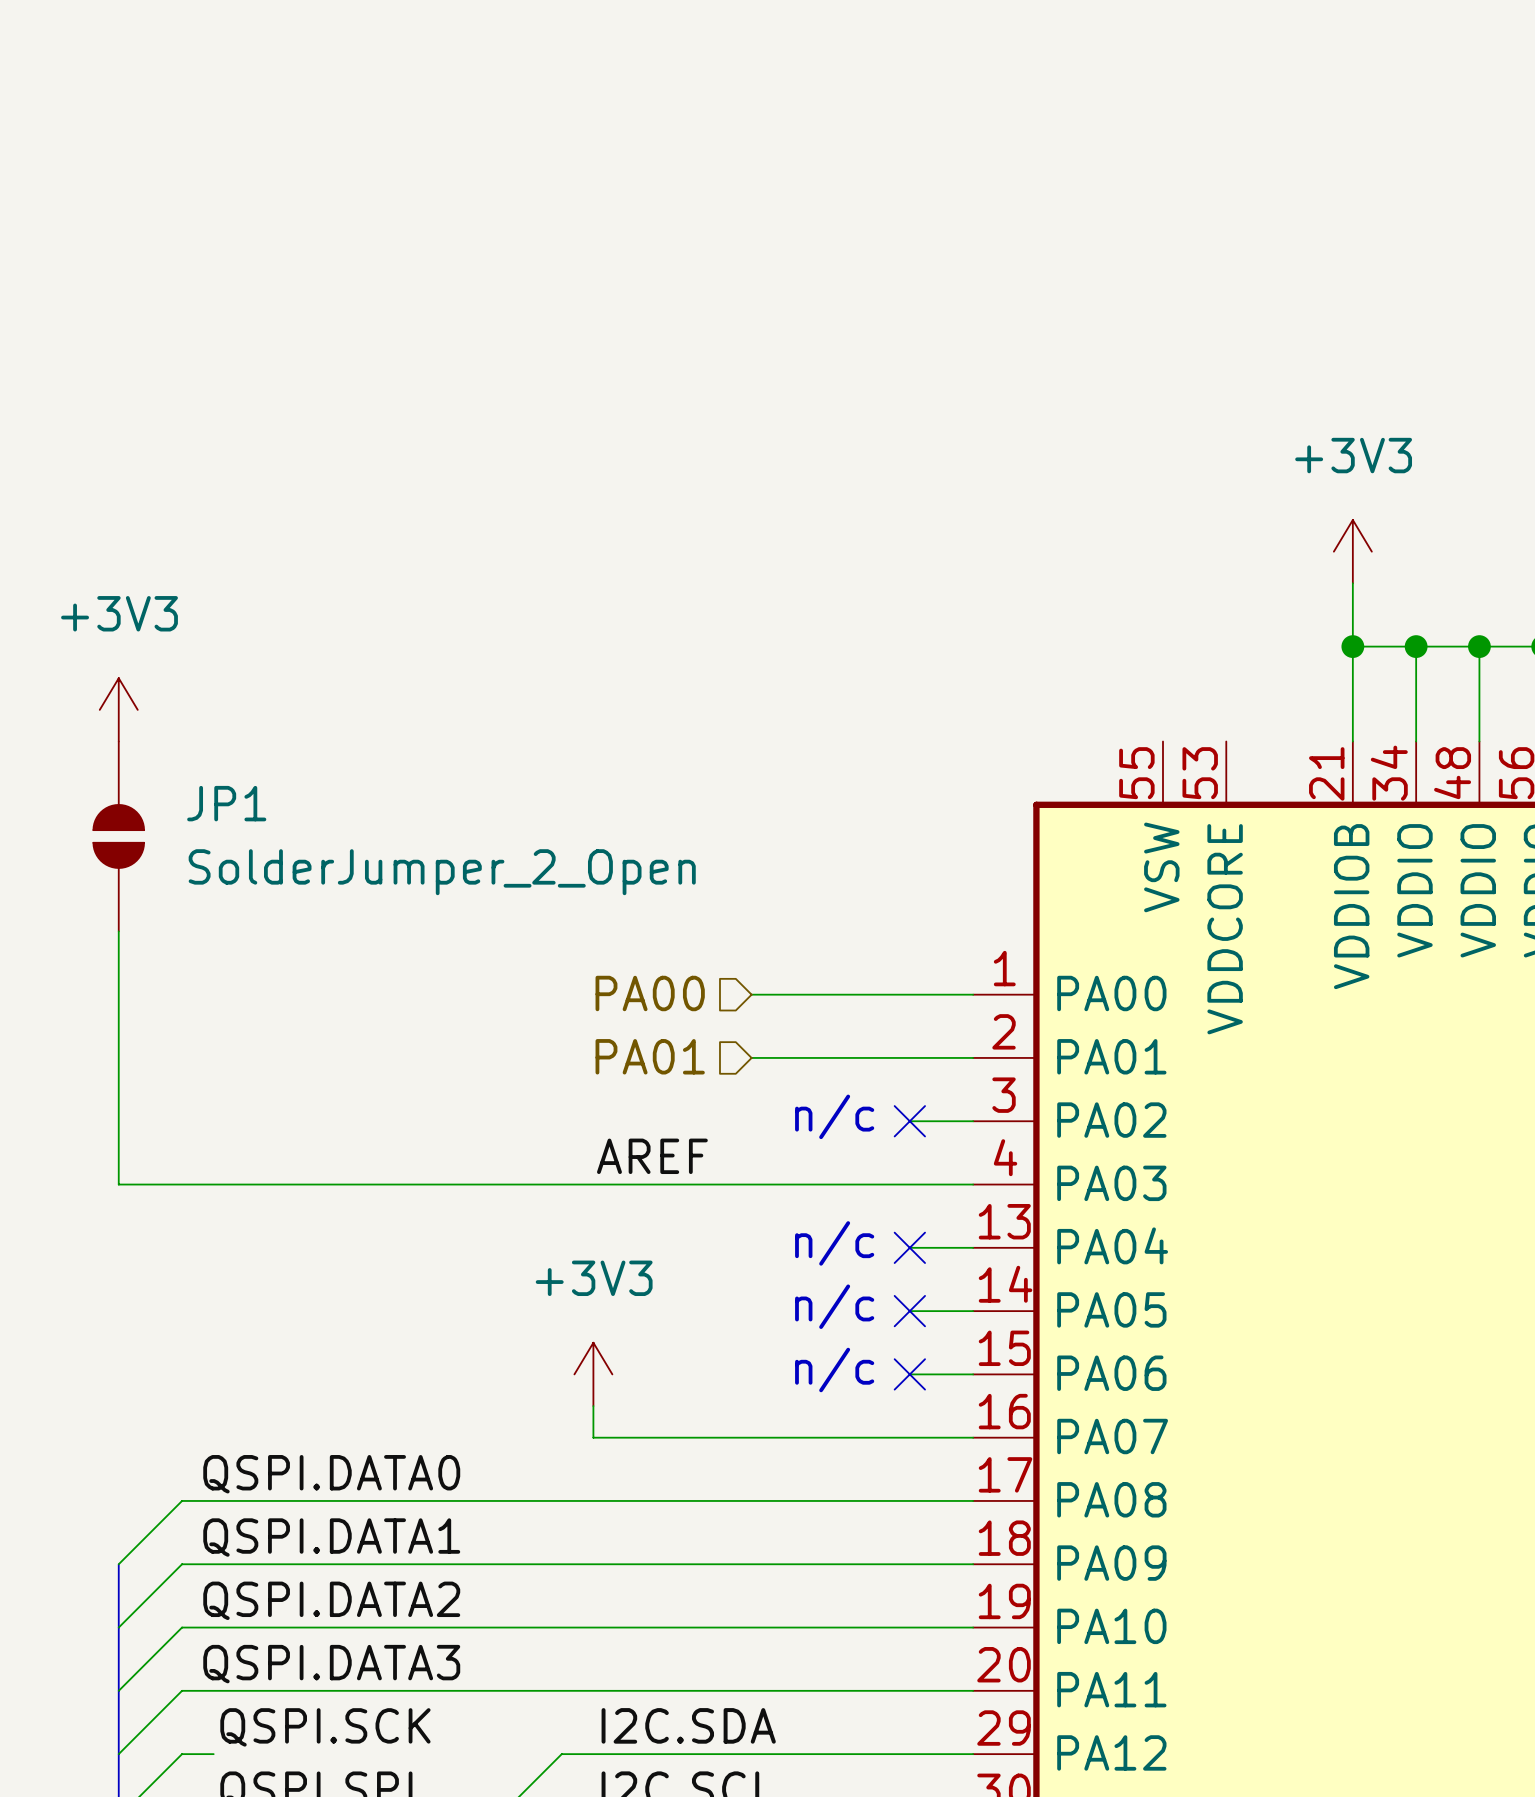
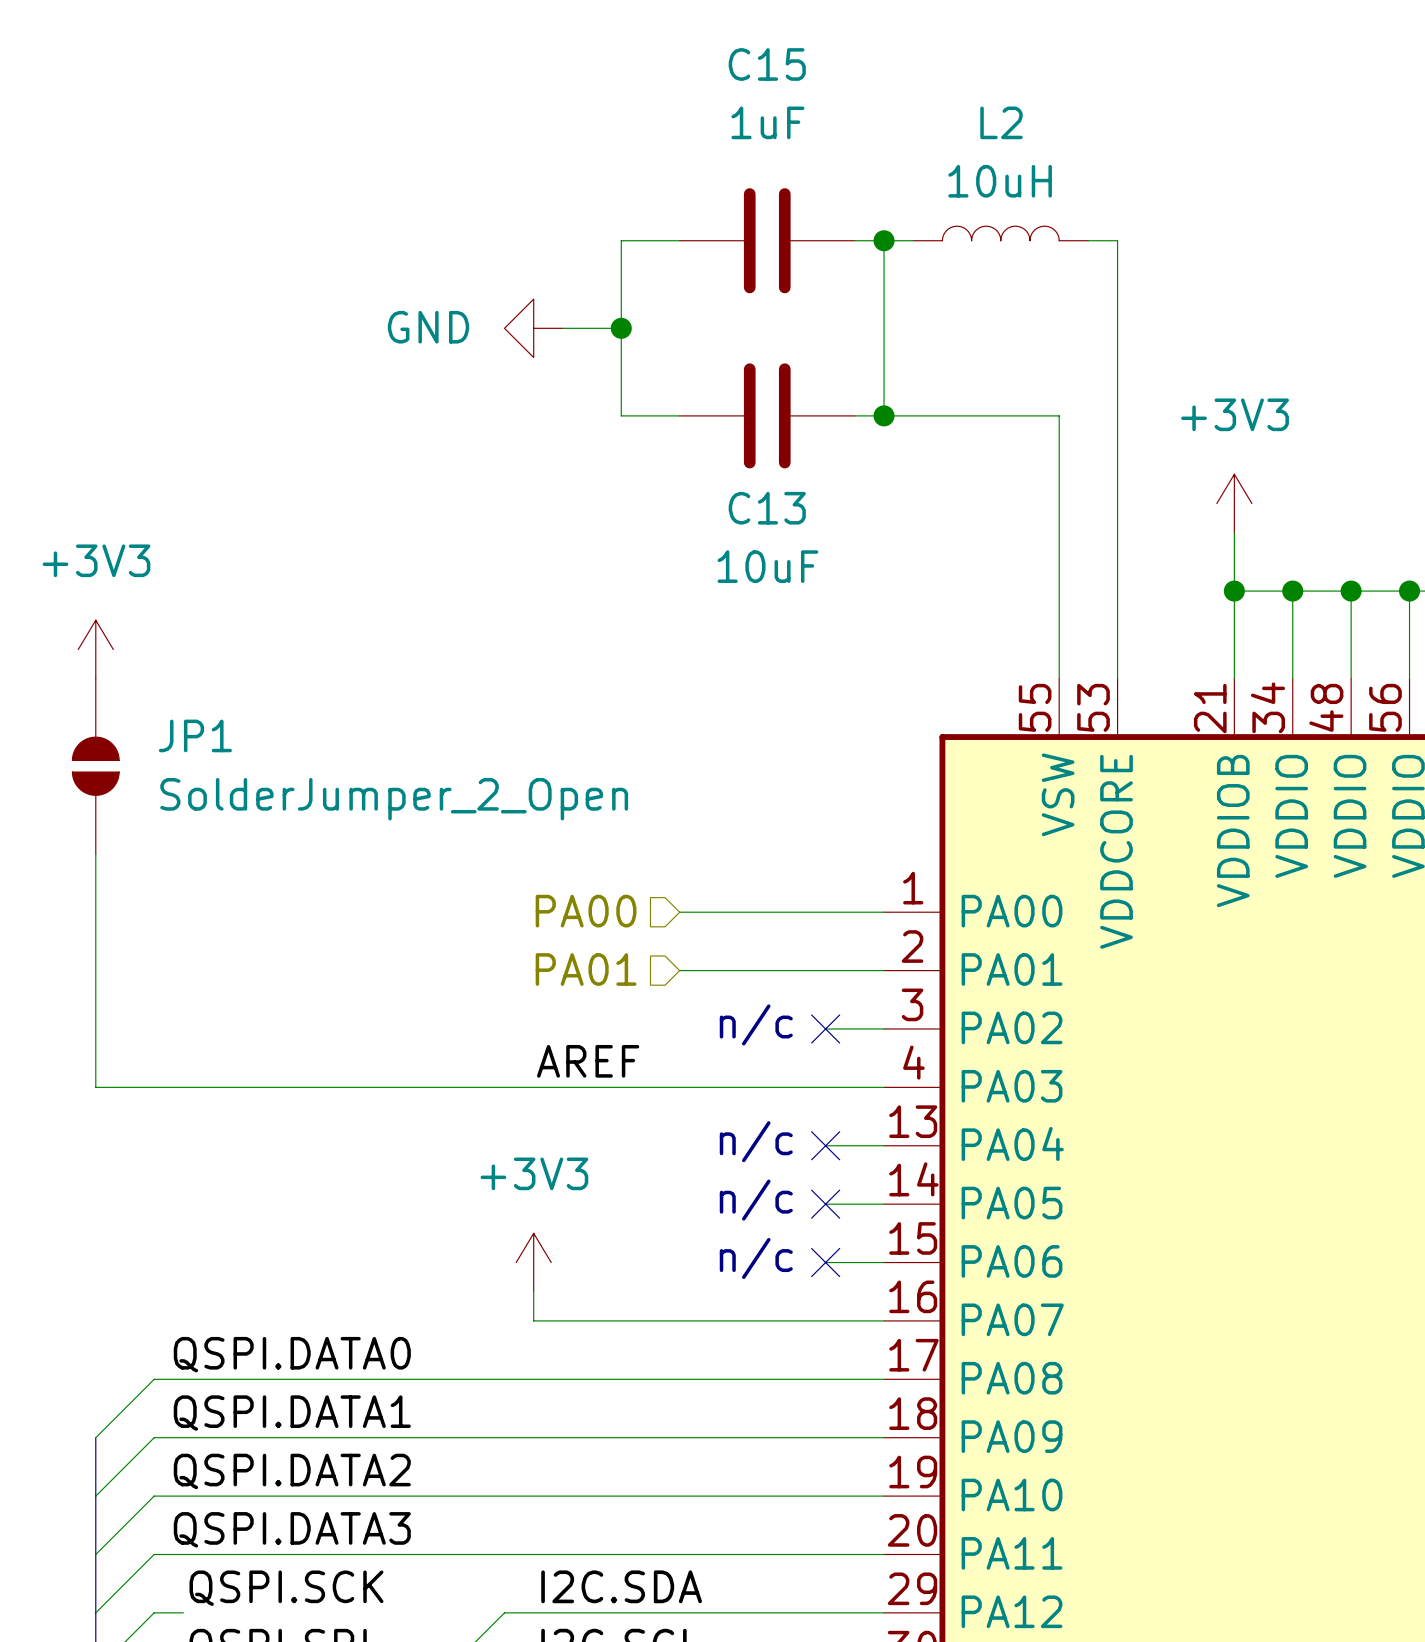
L2: none -> 10uH (1000, 233)
wire: none -> (679, 240) (621, 240) (621, 415) (679, 415)
C15: none -> 1uF (767, 240)
wire: none -> (854, 240) (913, 240)
wire: none -> (884, 240) (884, 415)
junction: none -> (884, 240)
wire: none -> (1088, 240) (1117, 240) (1117, 678)
power symbol: none -> GND (533, 328)
wire: none -> (562, 328) (621, 328)
junction: none -> (621, 328)
C13: none -> 10uF (767, 415)
wire: none -> (854, 415) (1059, 415) (1059, 678)
junction: none -> (884, 415)

